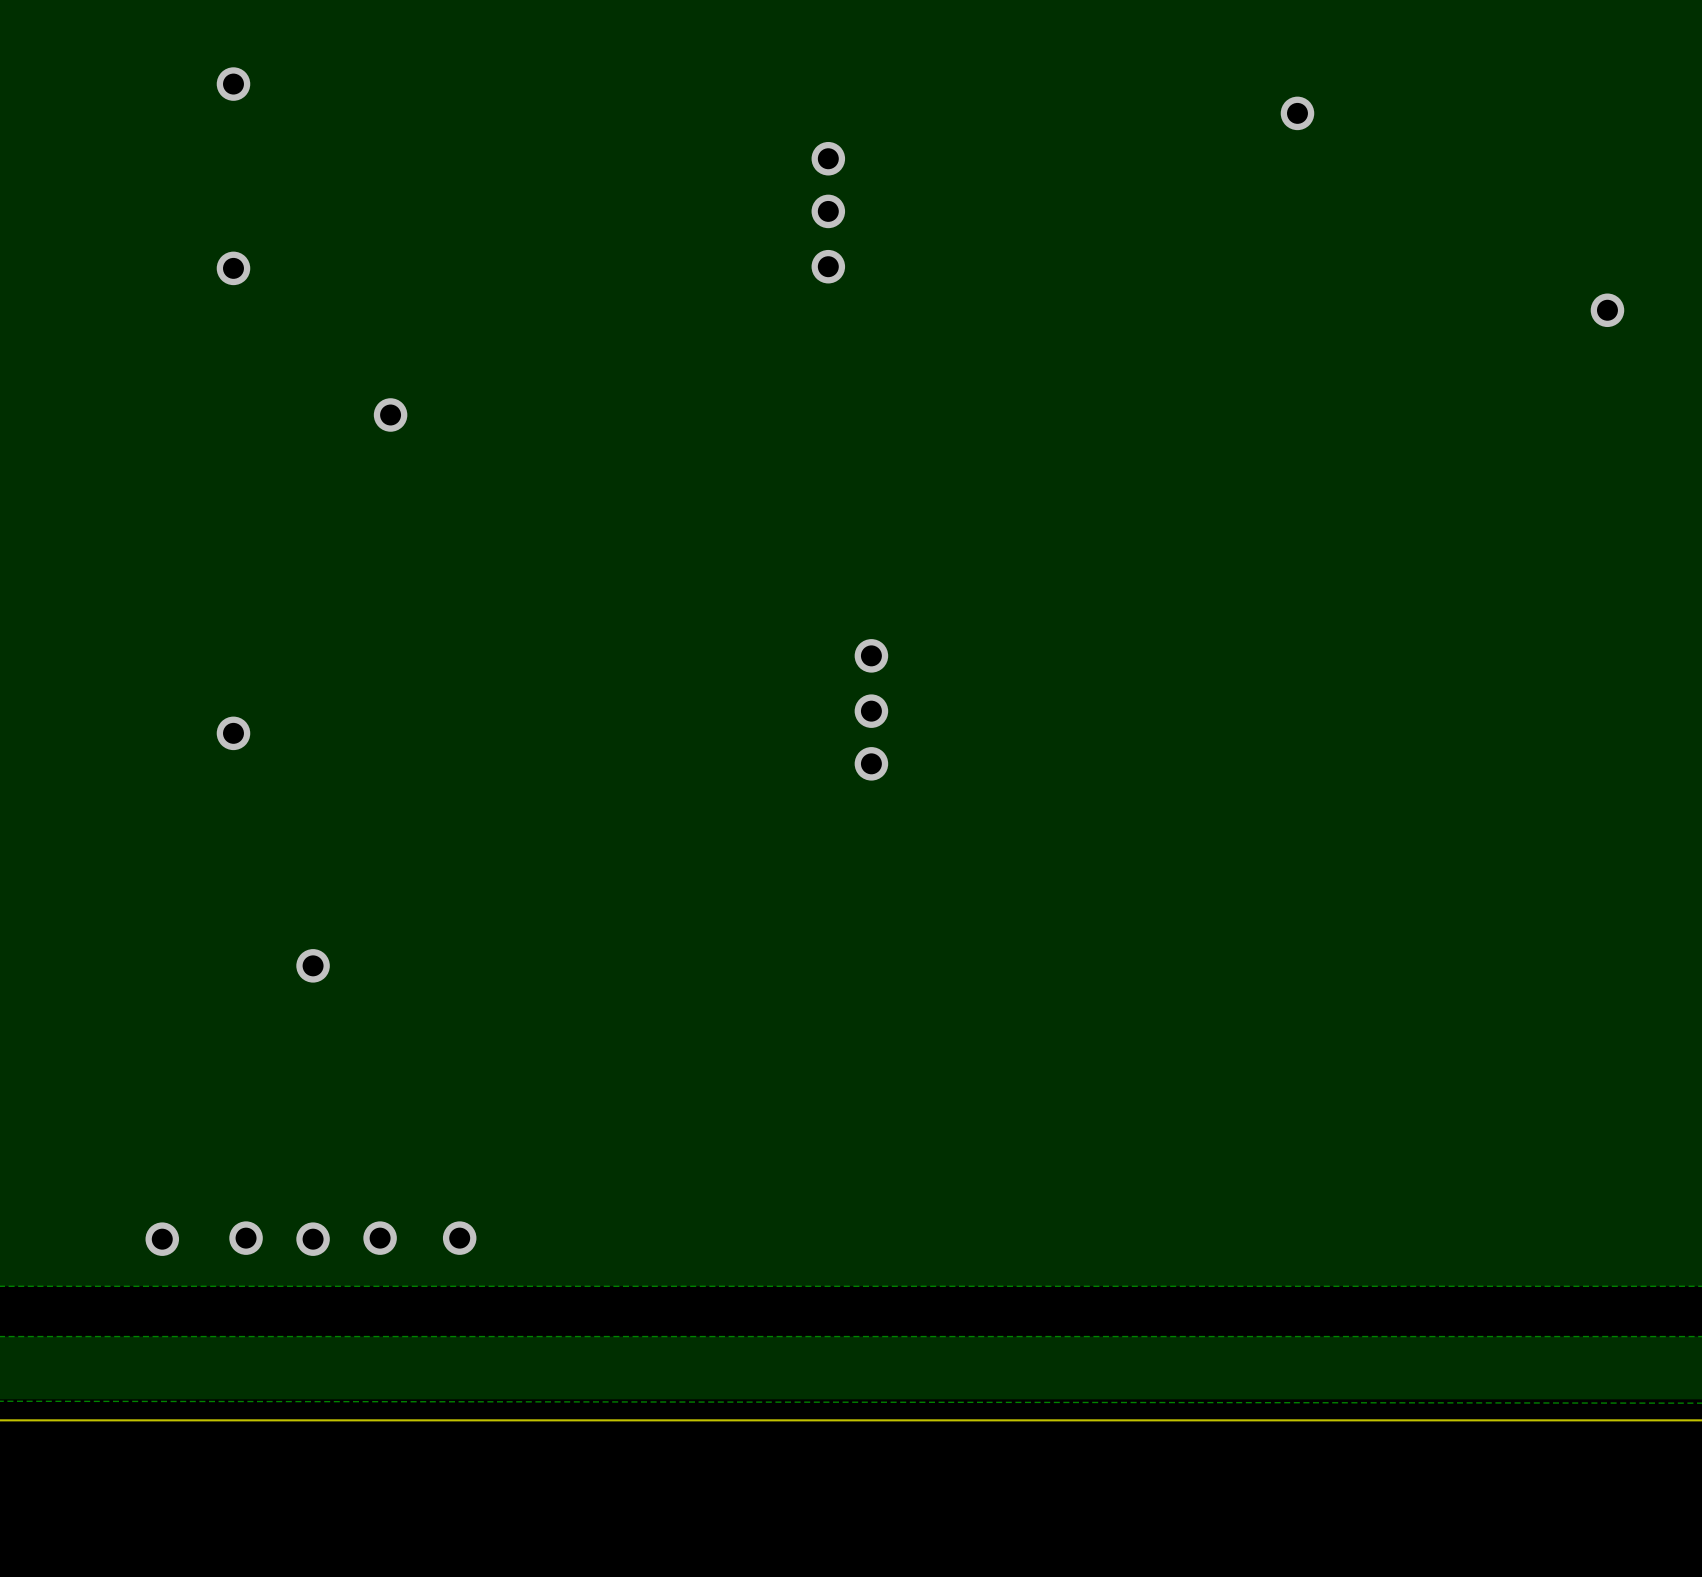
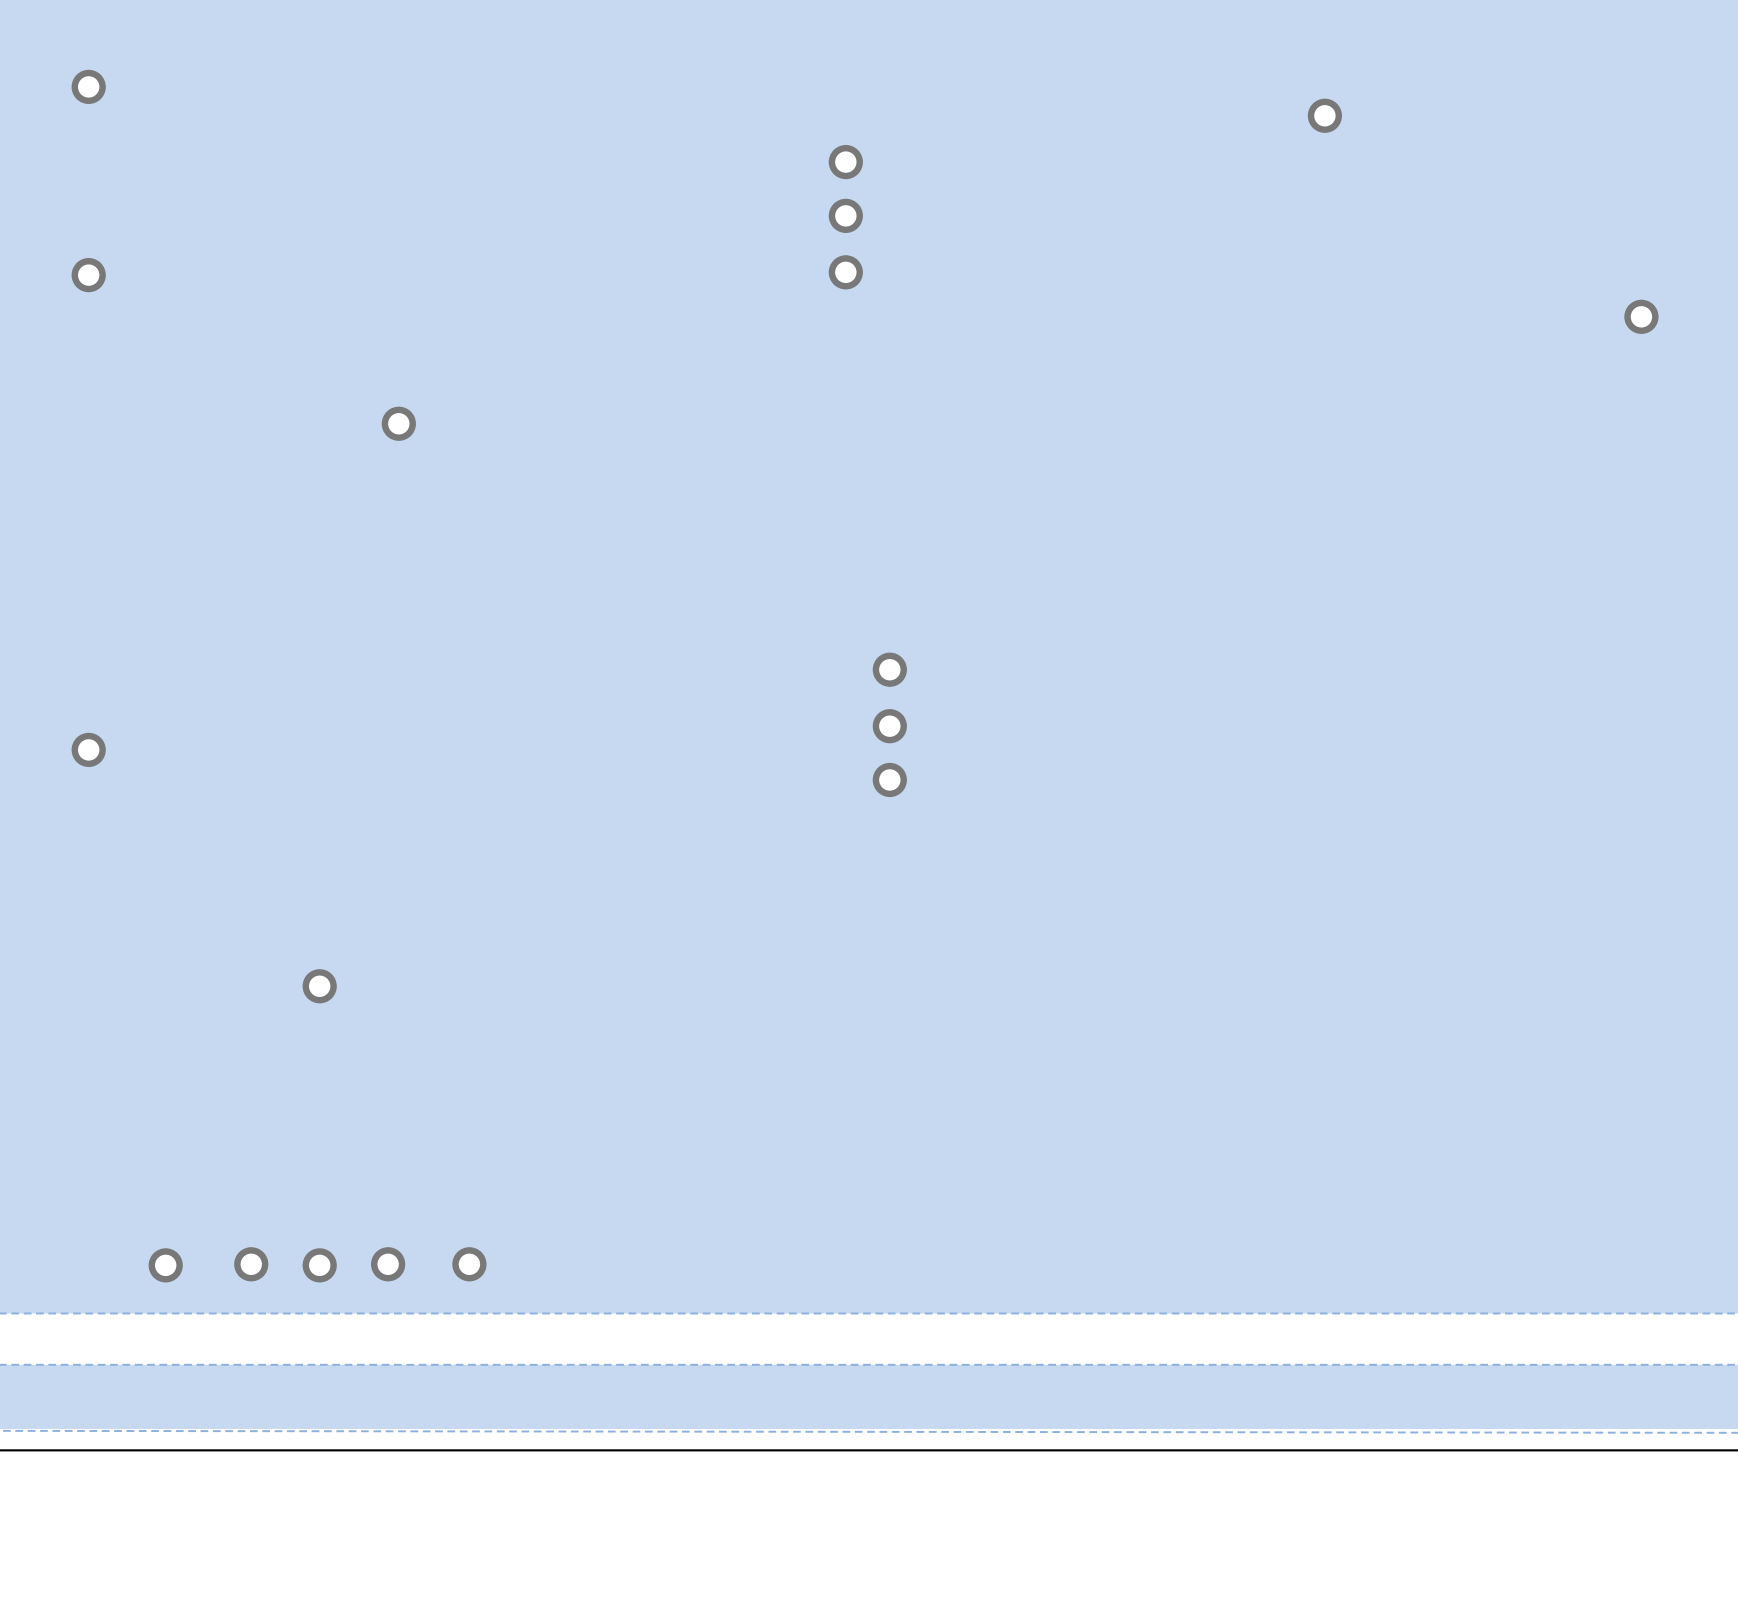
via: (233, 84) -> none
via: none -> (88, 86)
via: (233, 268) -> none
via: none -> (88, 275)
via: (233, 733) -> none
via: none -> (88, 749)

